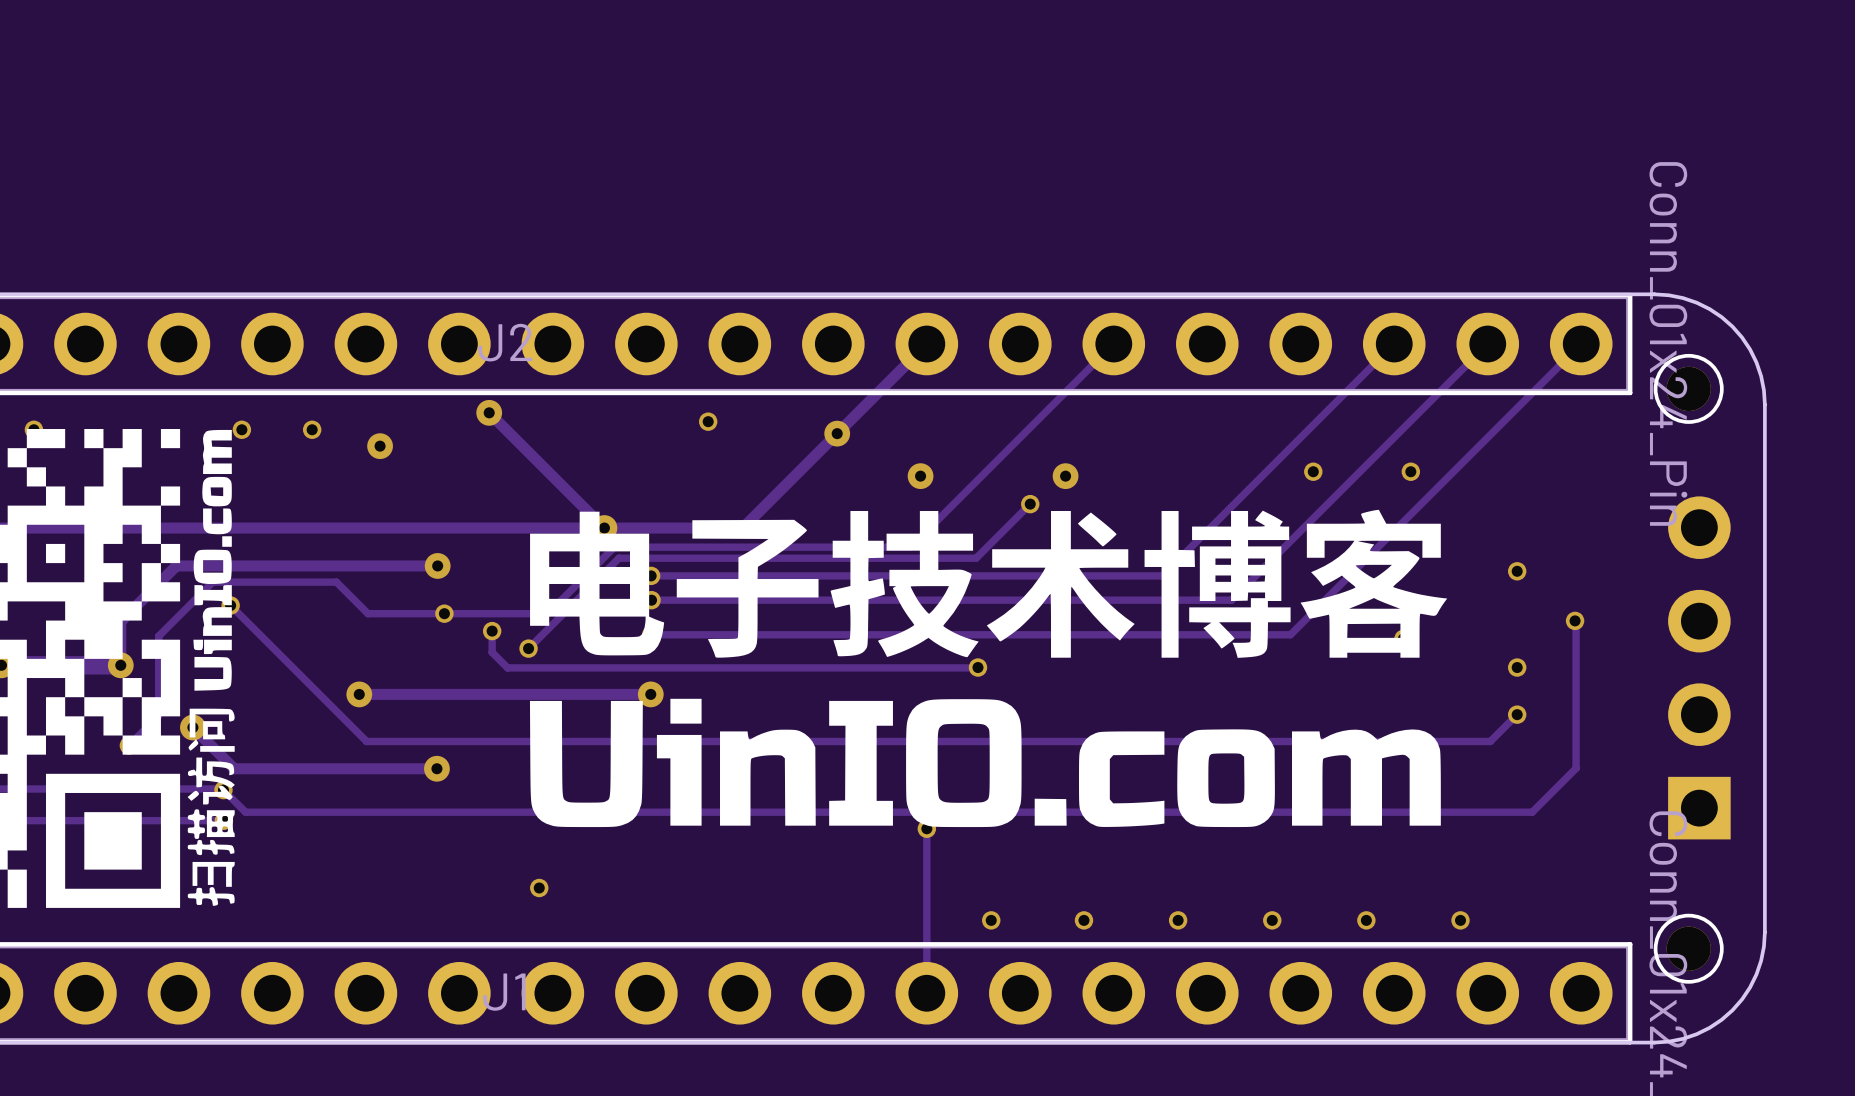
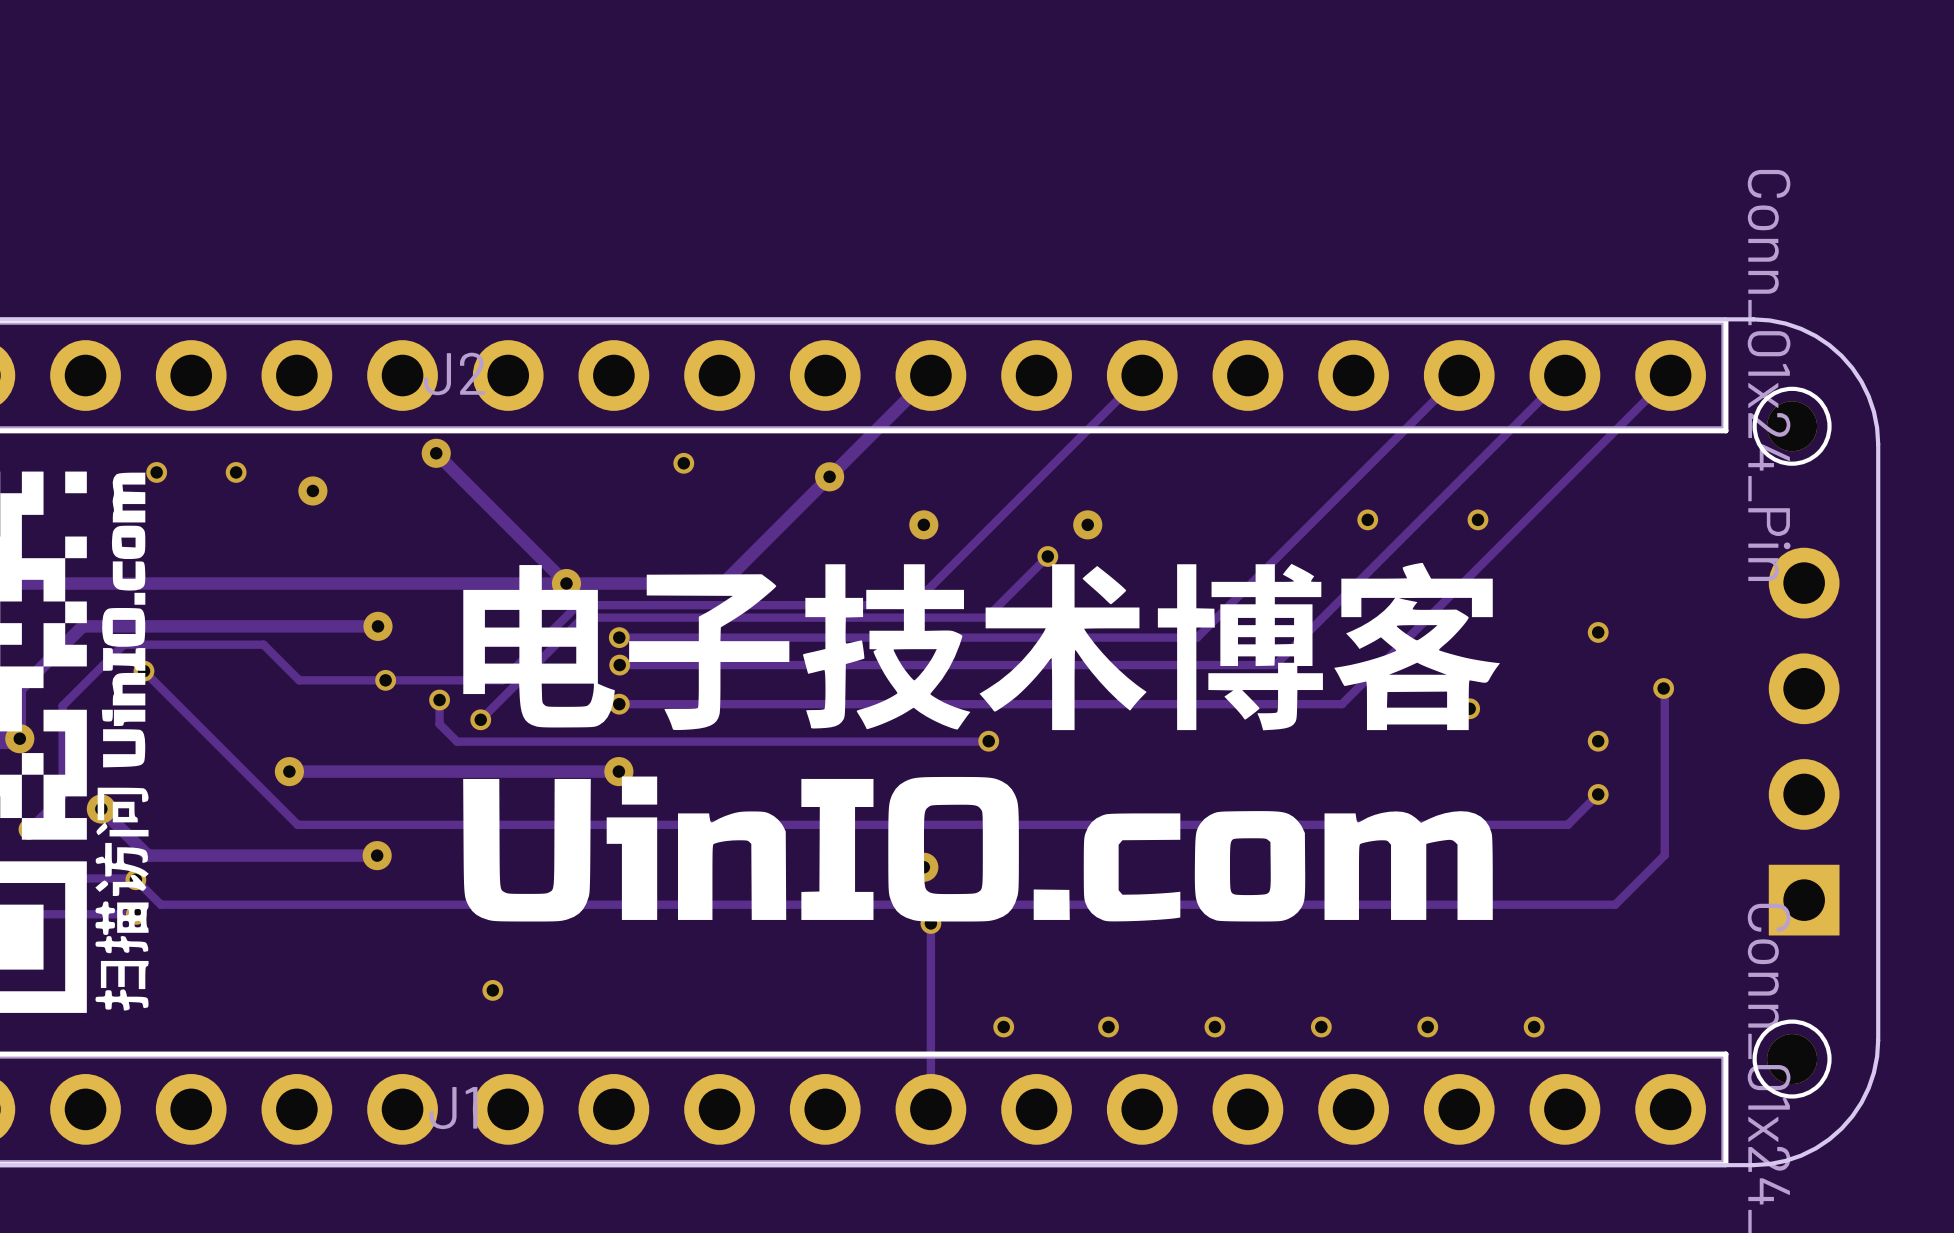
drawing position: (988, 668) -> (981, 742)

